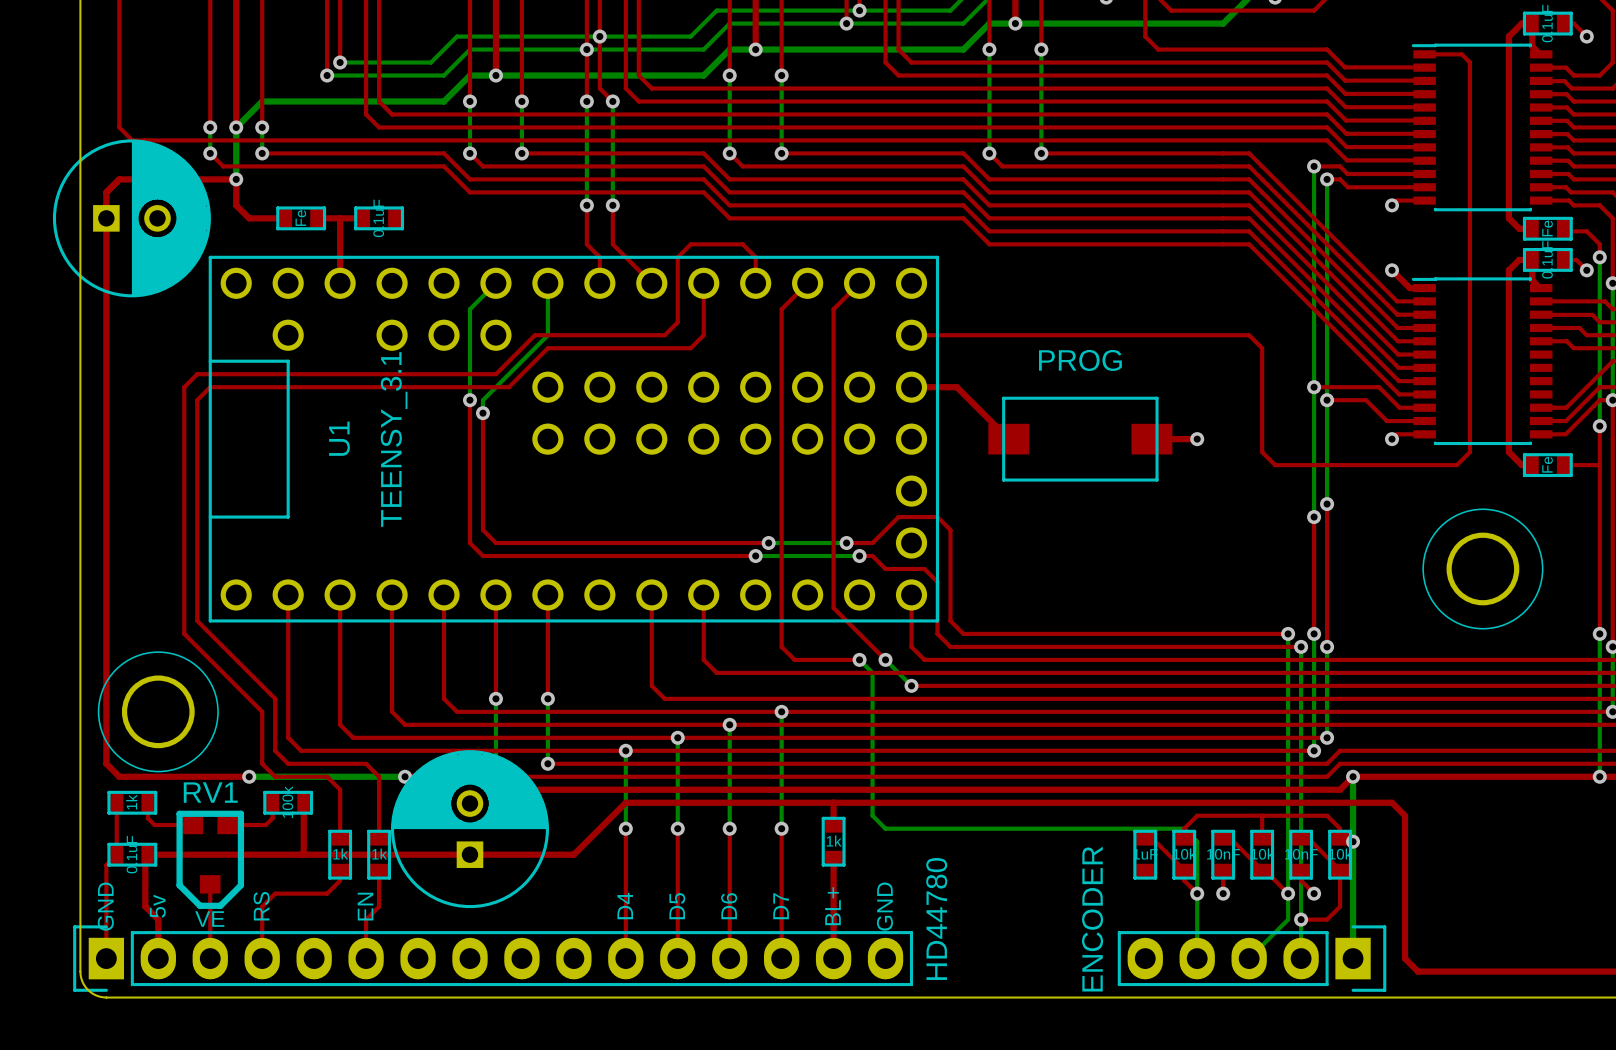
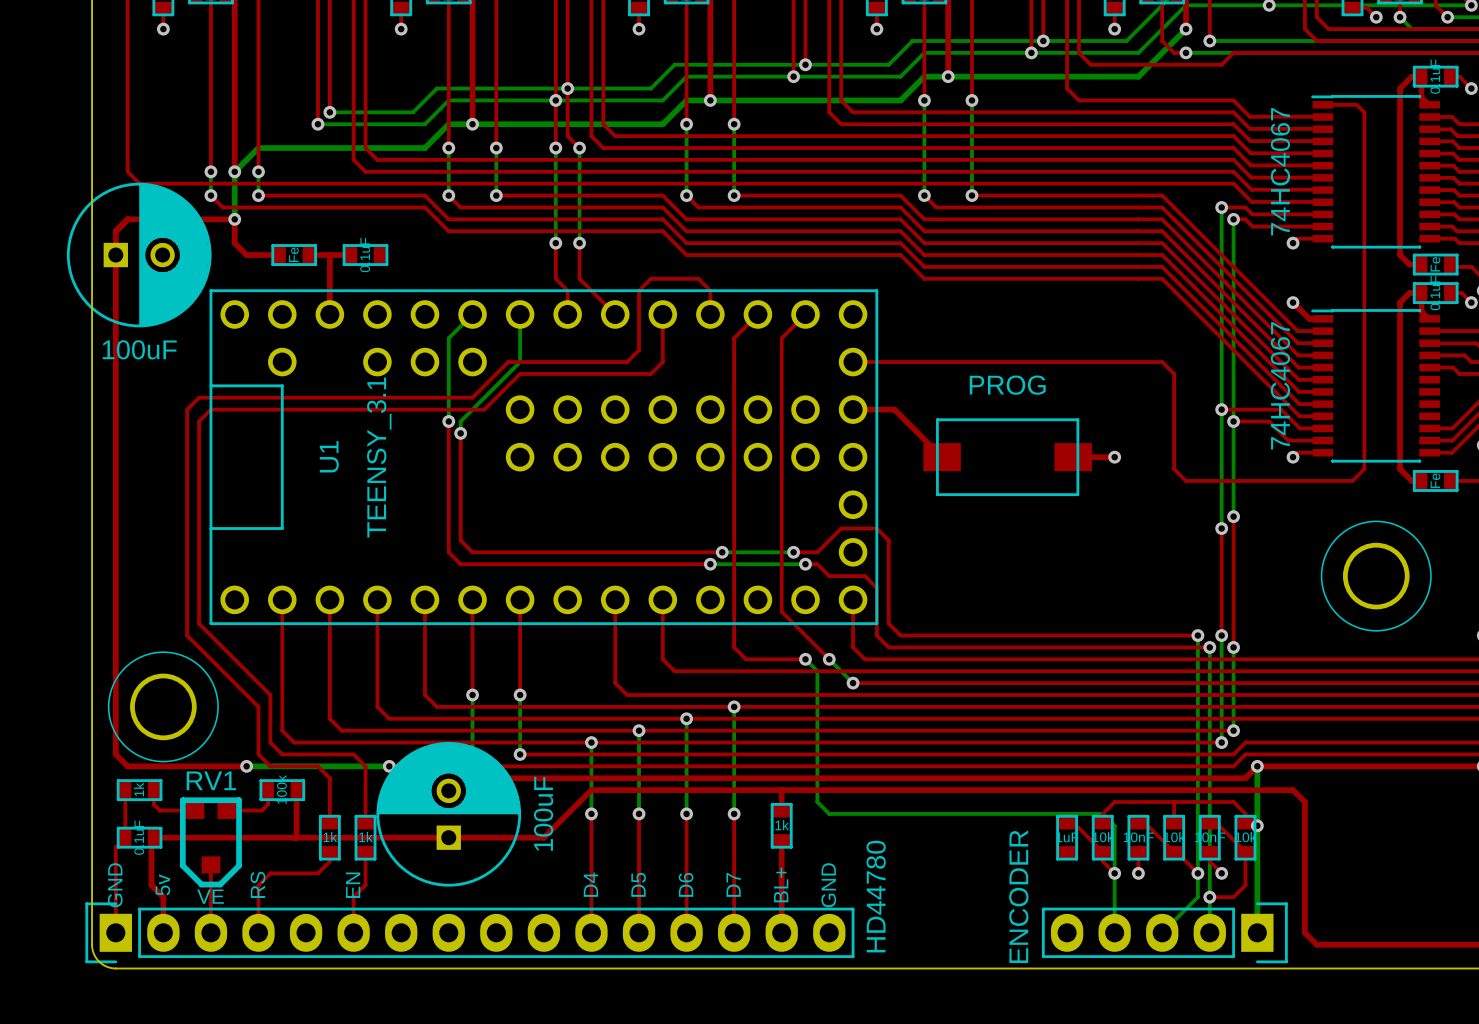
part value: none -> 74HC4067 (1280, 171)
part value: none -> 100uF (139, 349)
part value: none -> 74HC4067 (1280, 385)
part value: none -> 100uF (543, 813)

